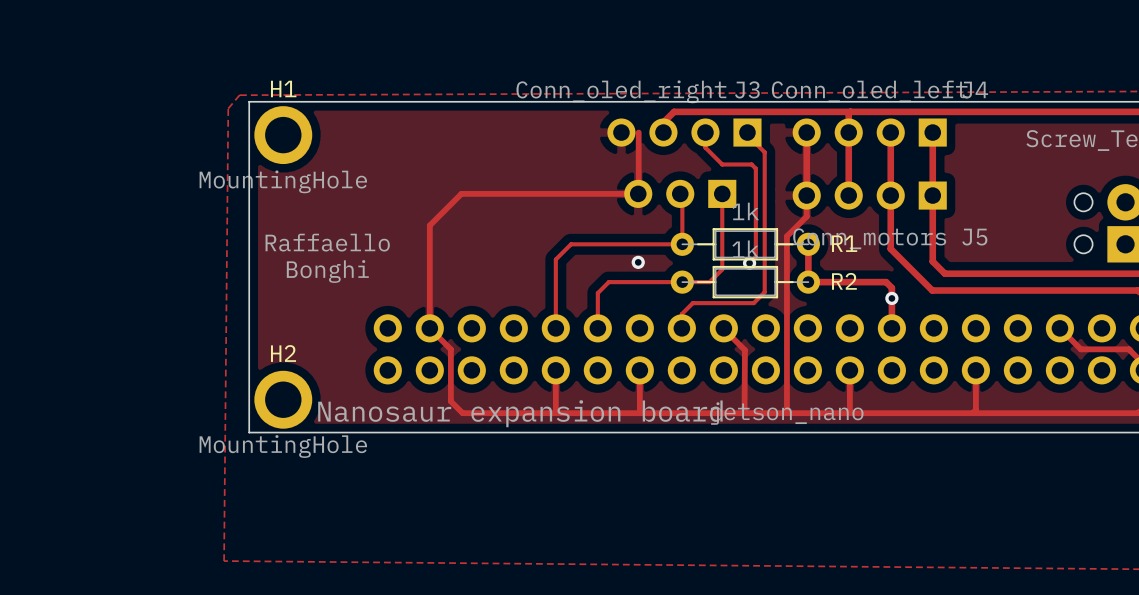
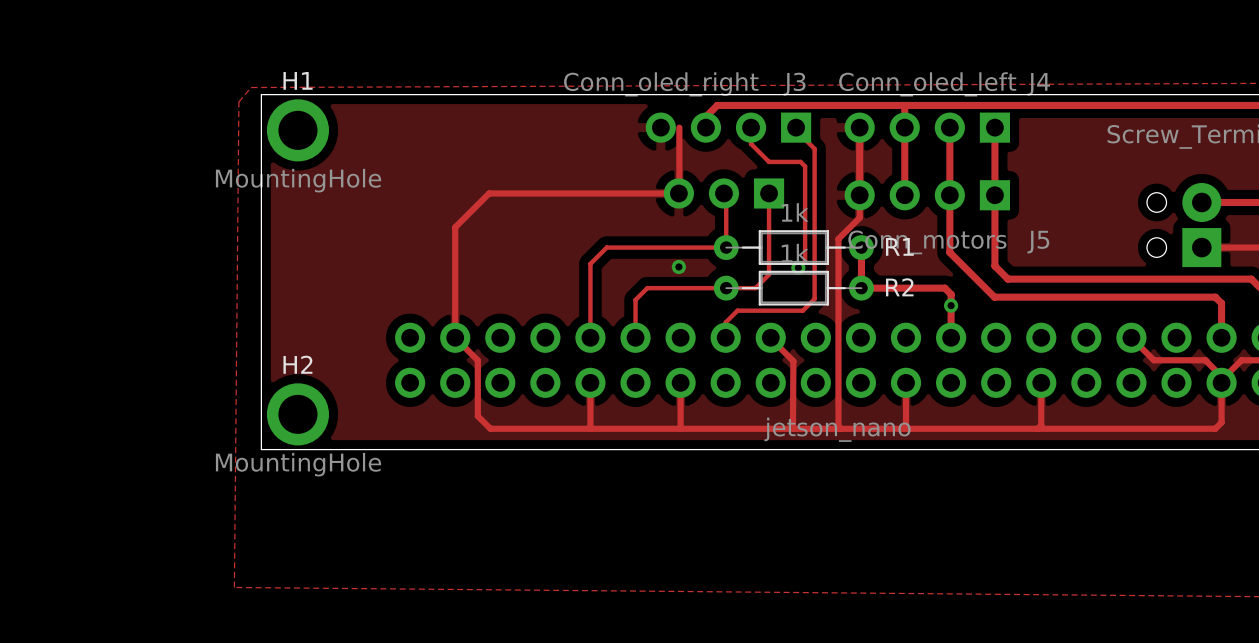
text: Raffaello (327, 242) -> none
text: Bonghi (327, 271) -> none
text: Nanosaur expansion board (520, 413) -> none

